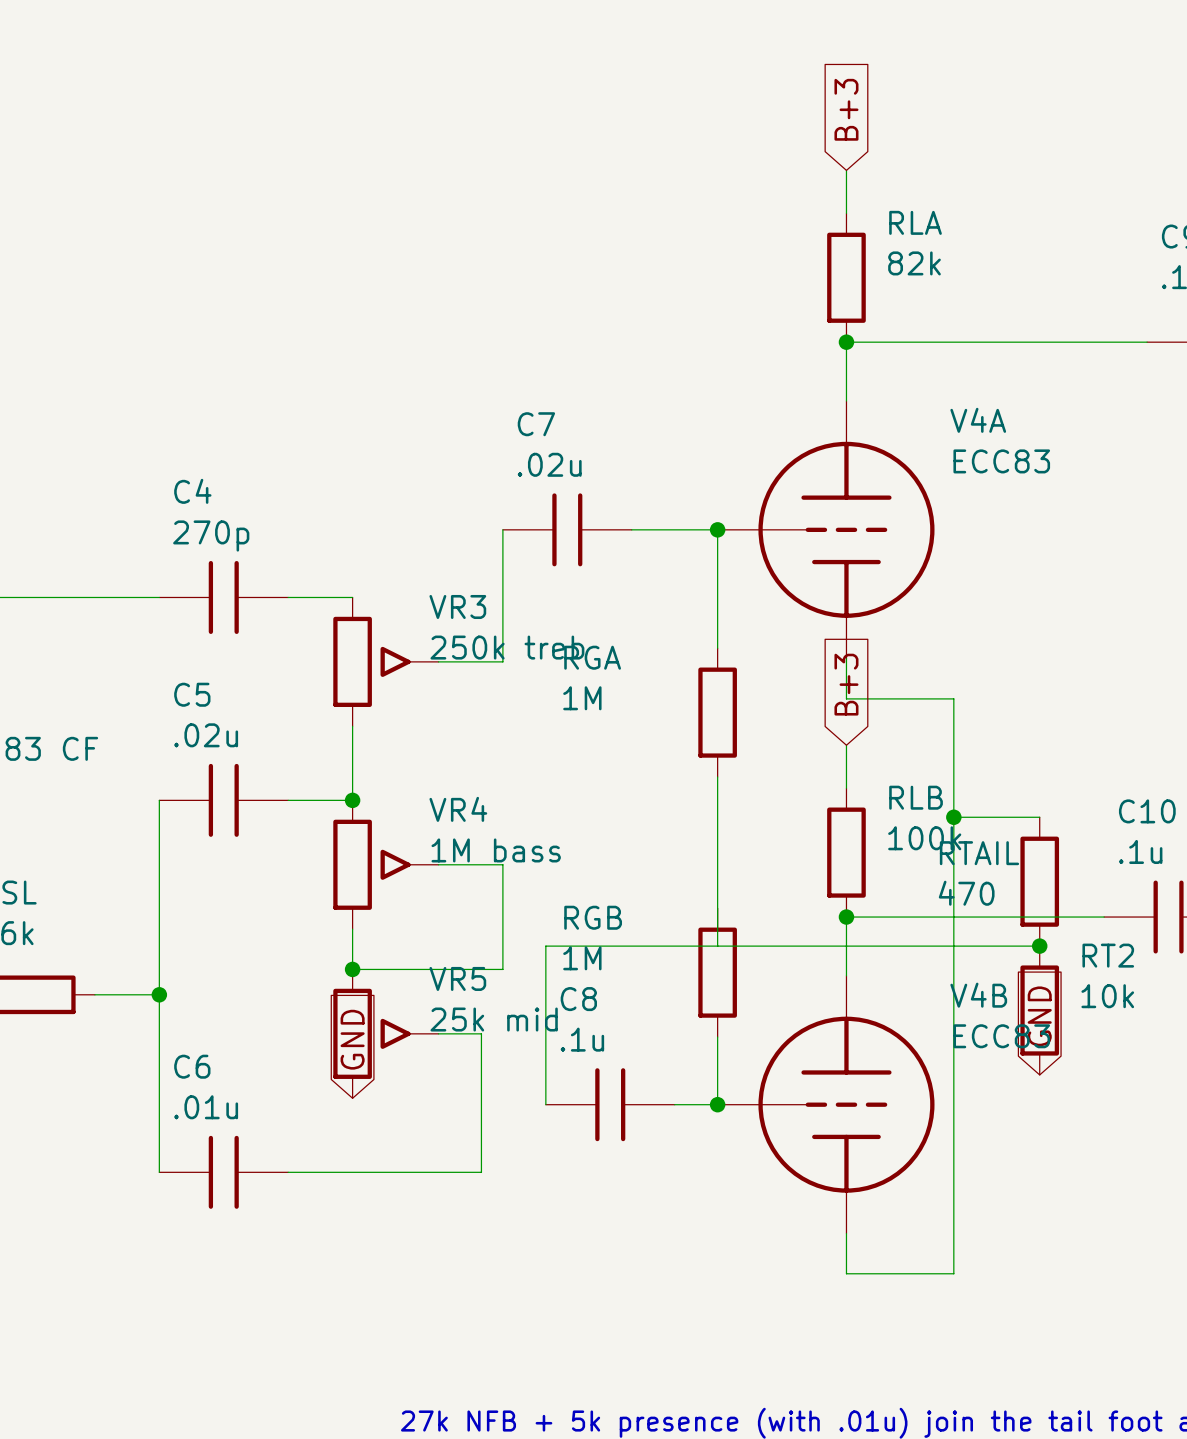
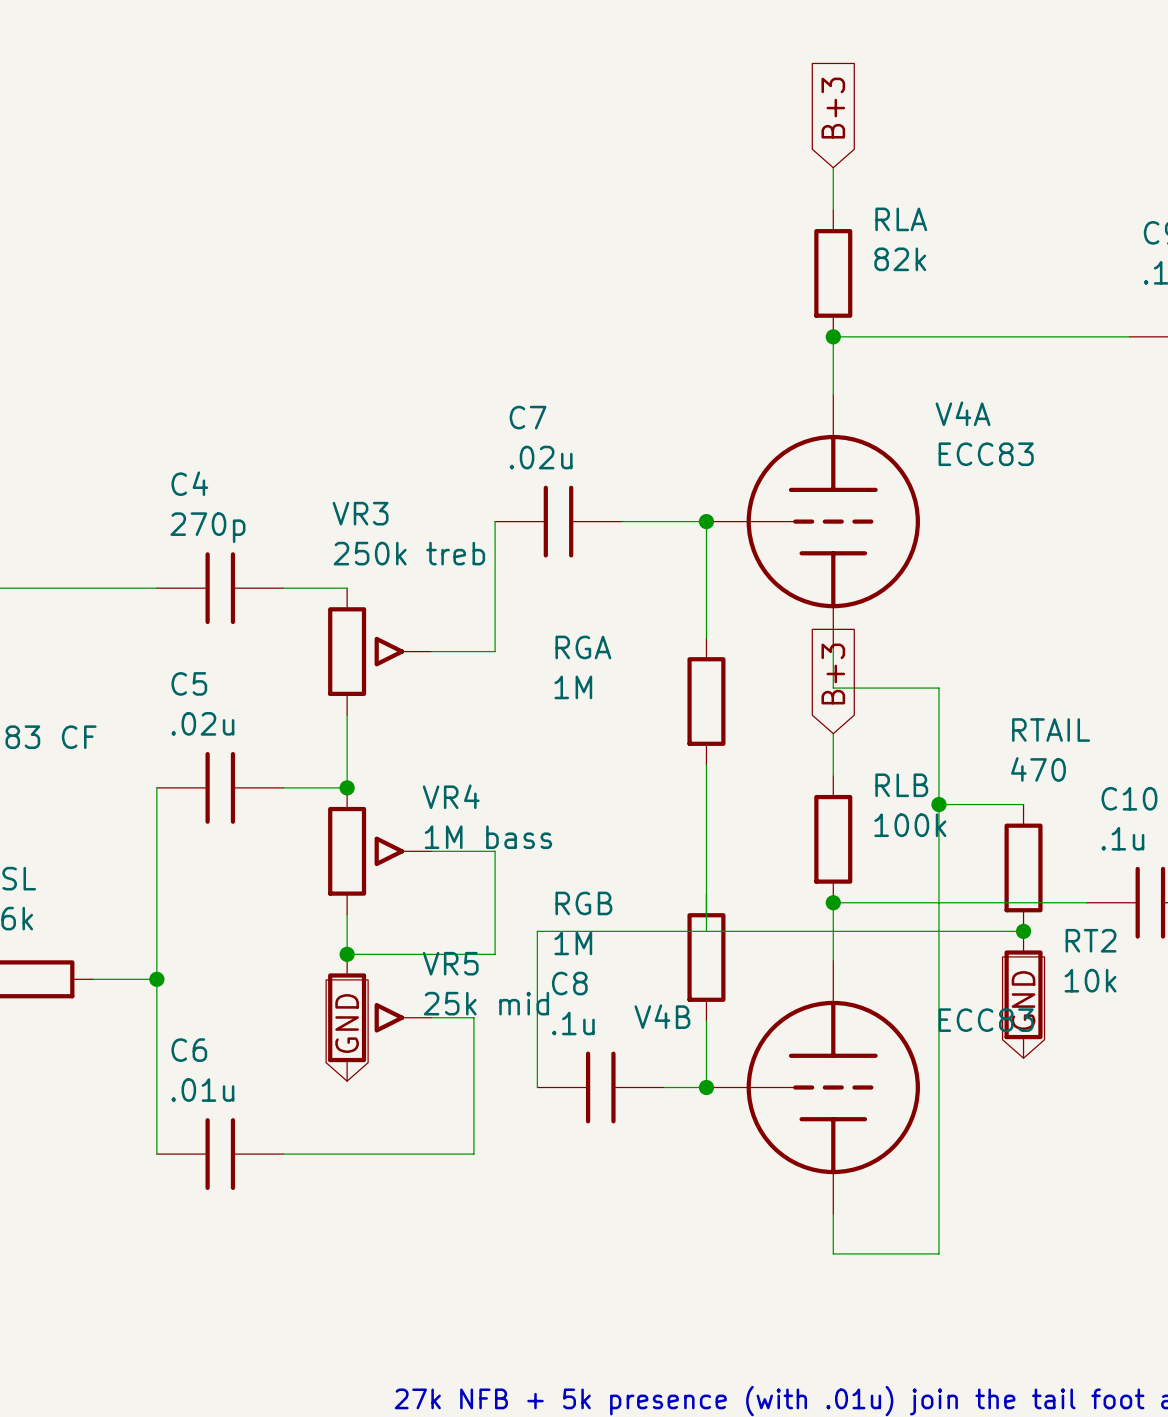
VR3 name position: VR3 (457, 606) -> VR3 (360, 513)
VR3 value position: 250k treb (507, 647) -> 250k treb (409, 553)
RTAIL name position: RTAIL (979, 853) -> RTAIL (1051, 730)
RTAIL value position: 470 (966, 893) -> 470 (1038, 769)
V4B name position: V4B (978, 995) -> V4B (662, 1016)

